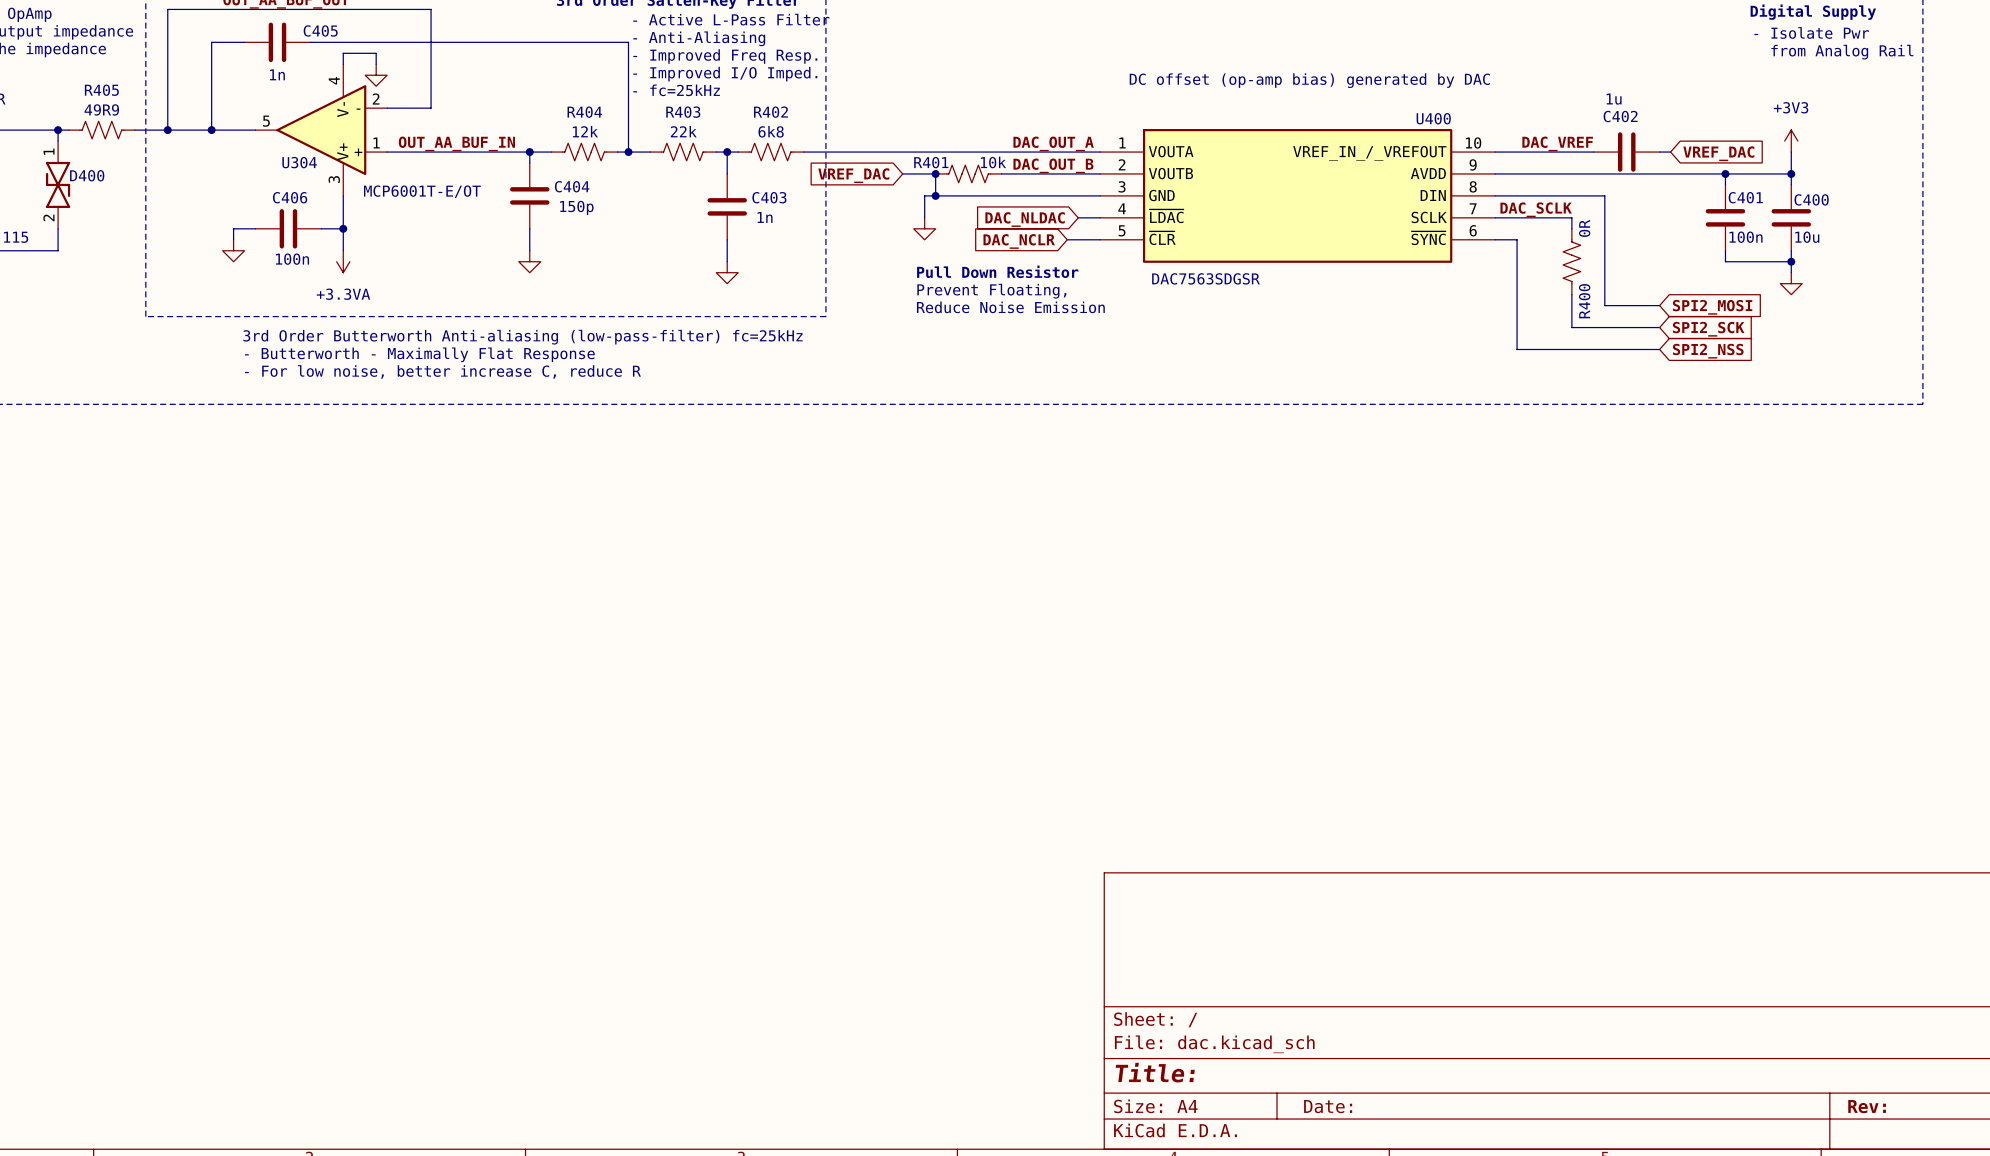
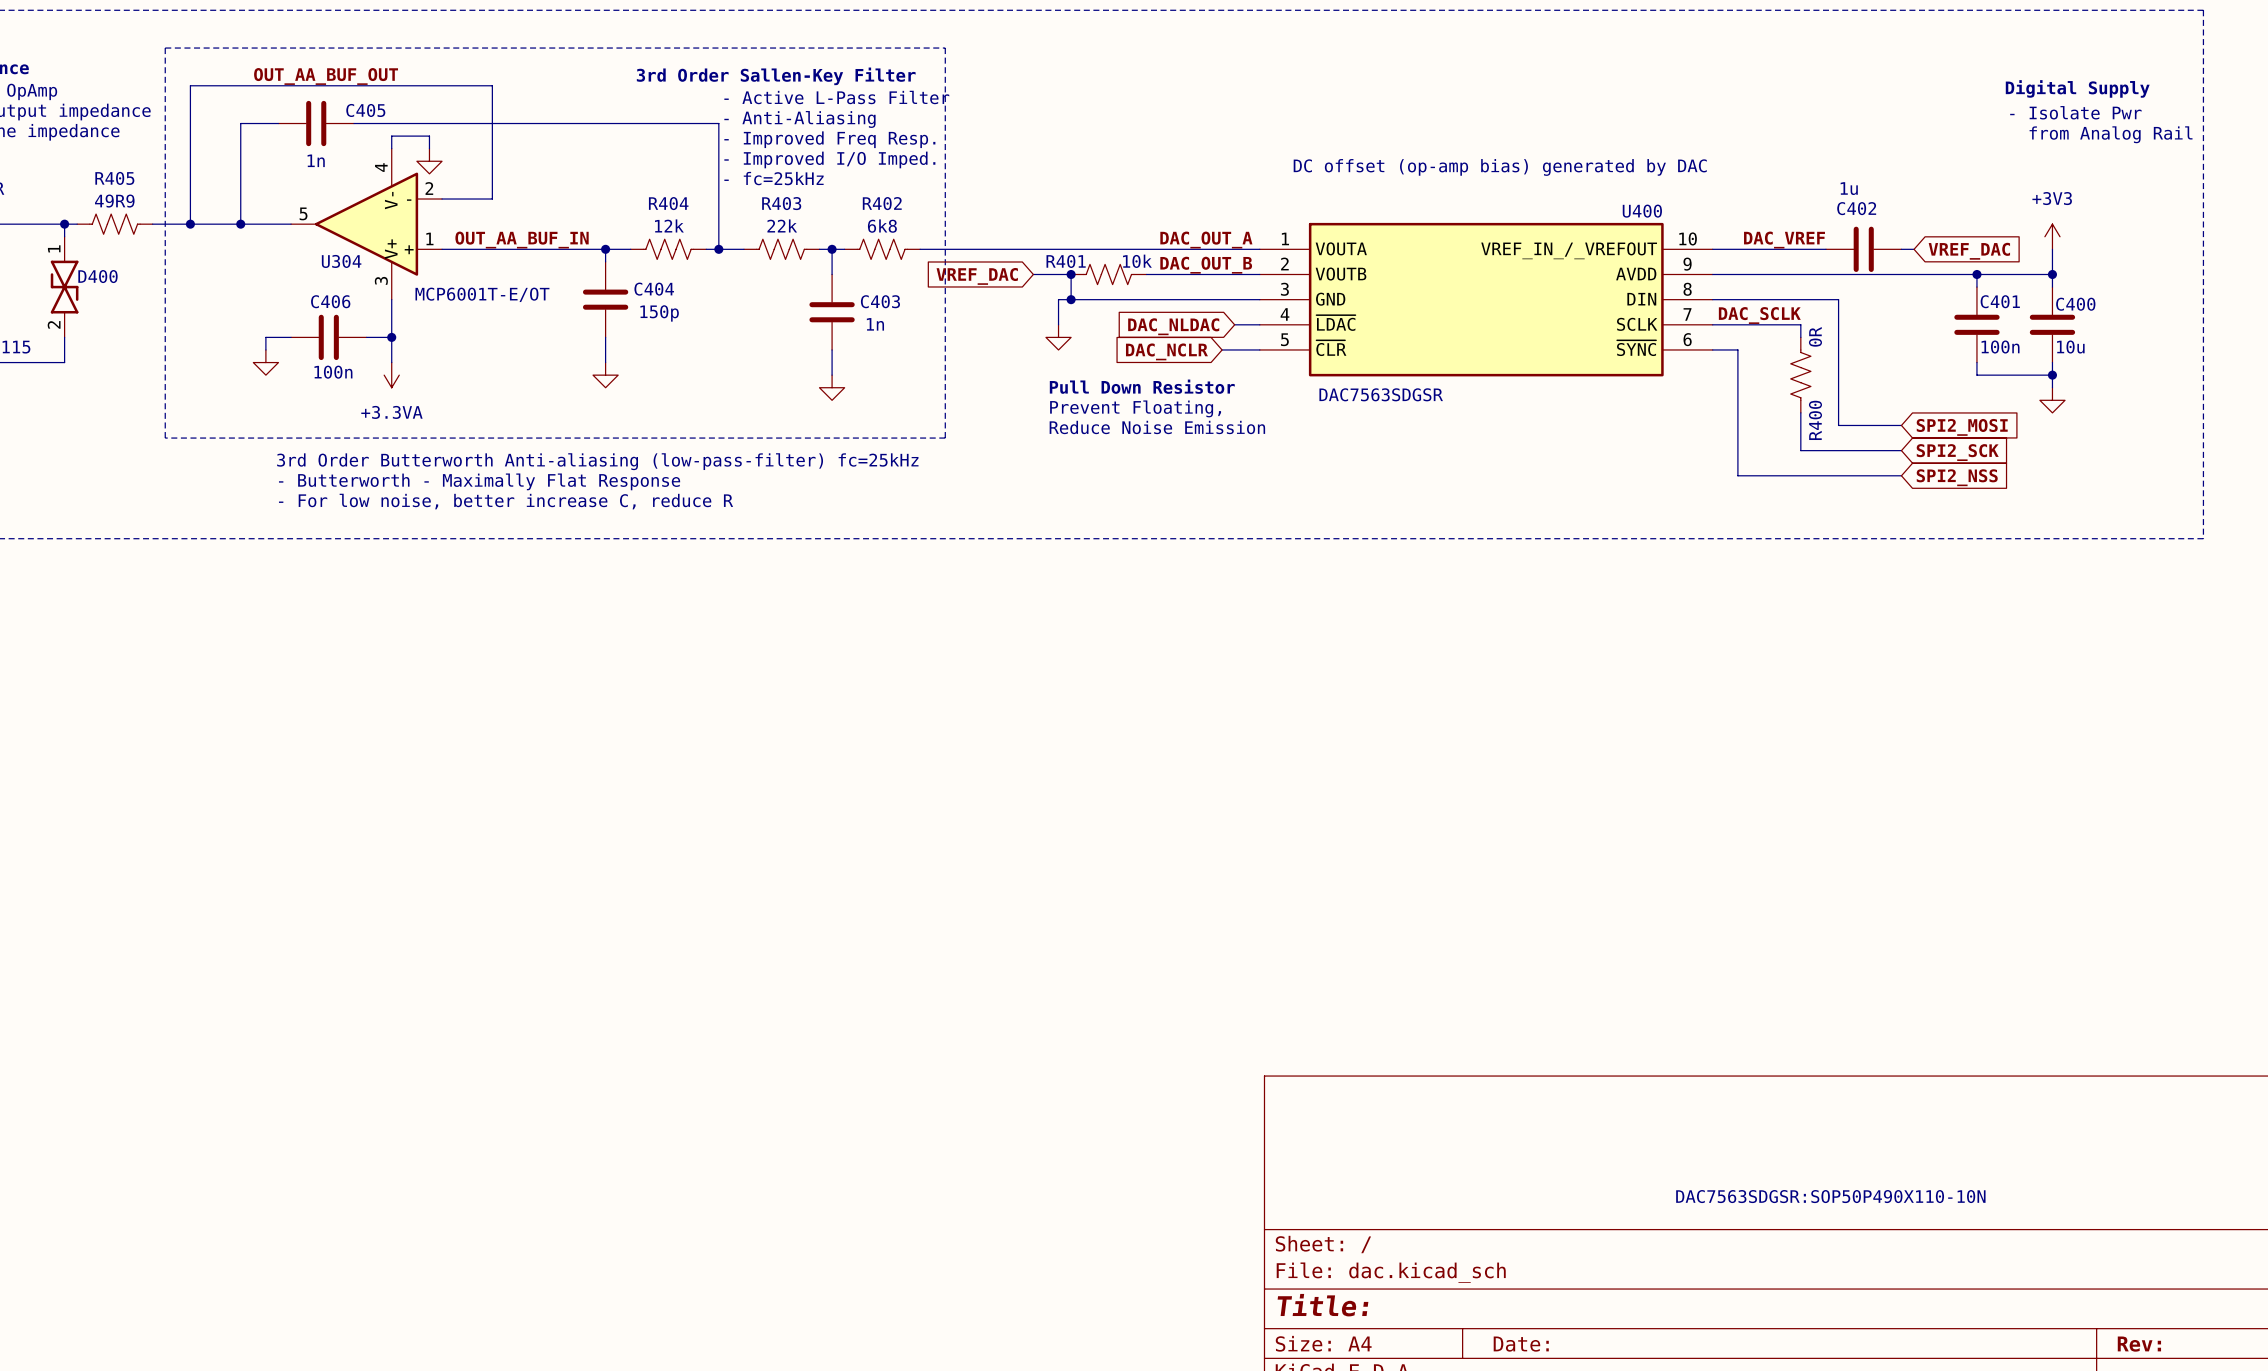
U400 text: none -> DAC7563SDGSR:SOP50P490X110-10N (1830, 1196)

